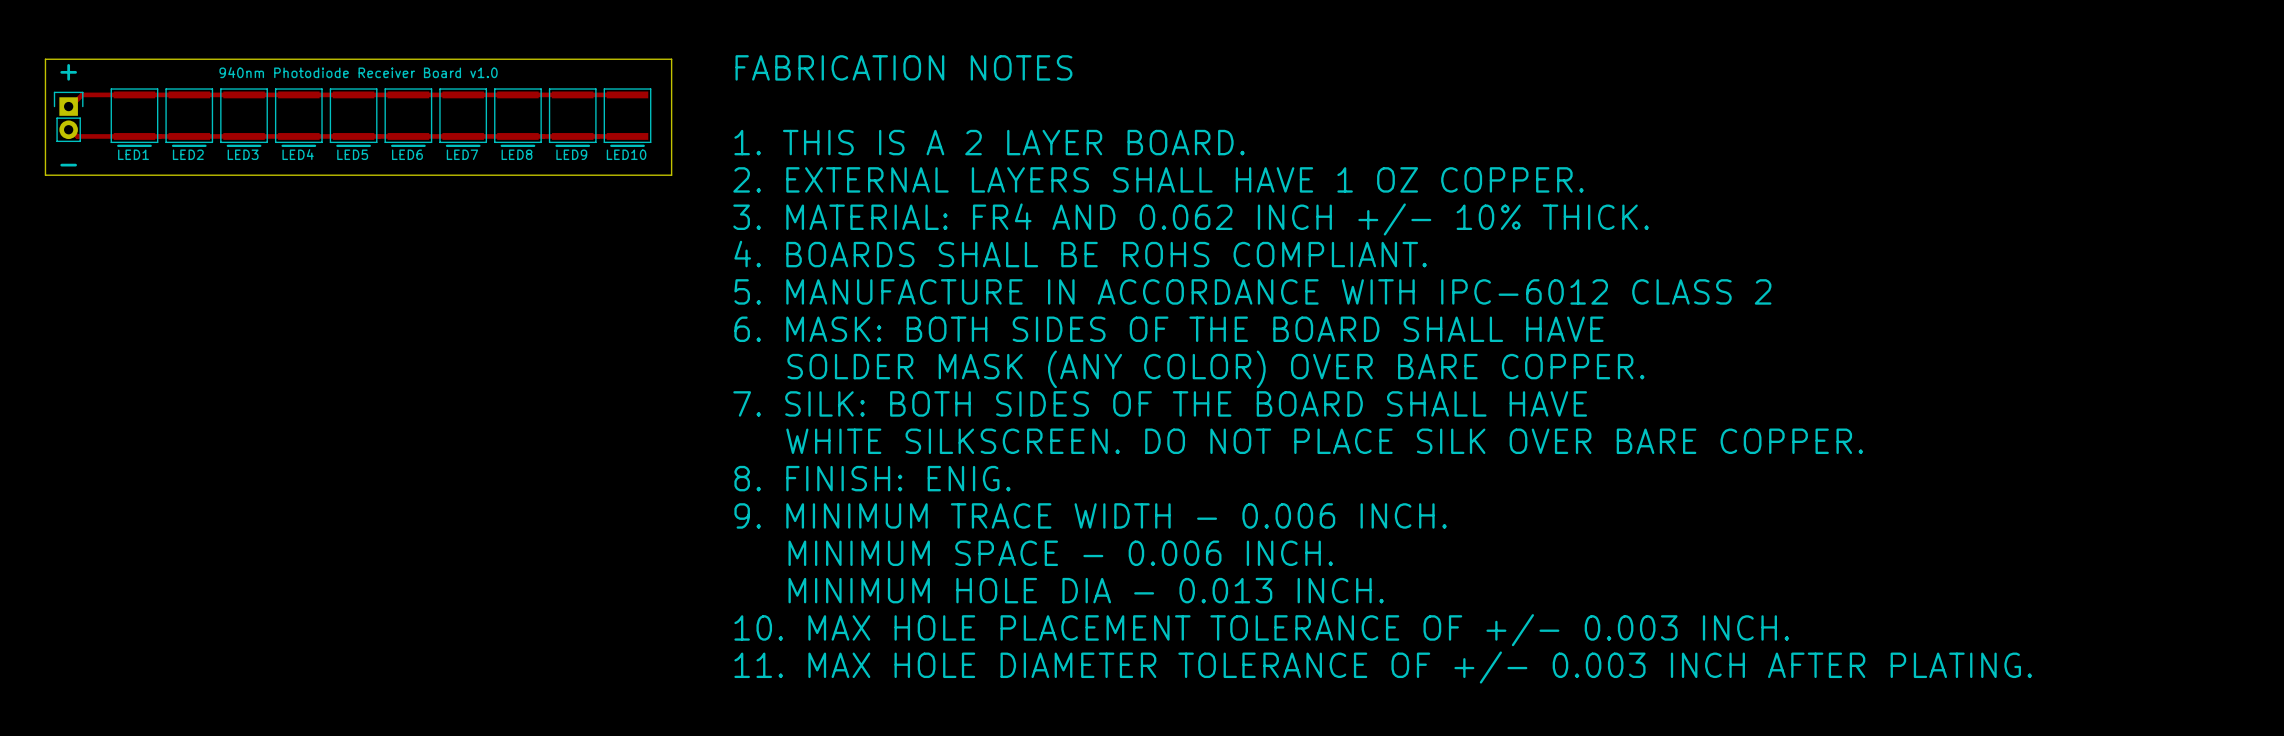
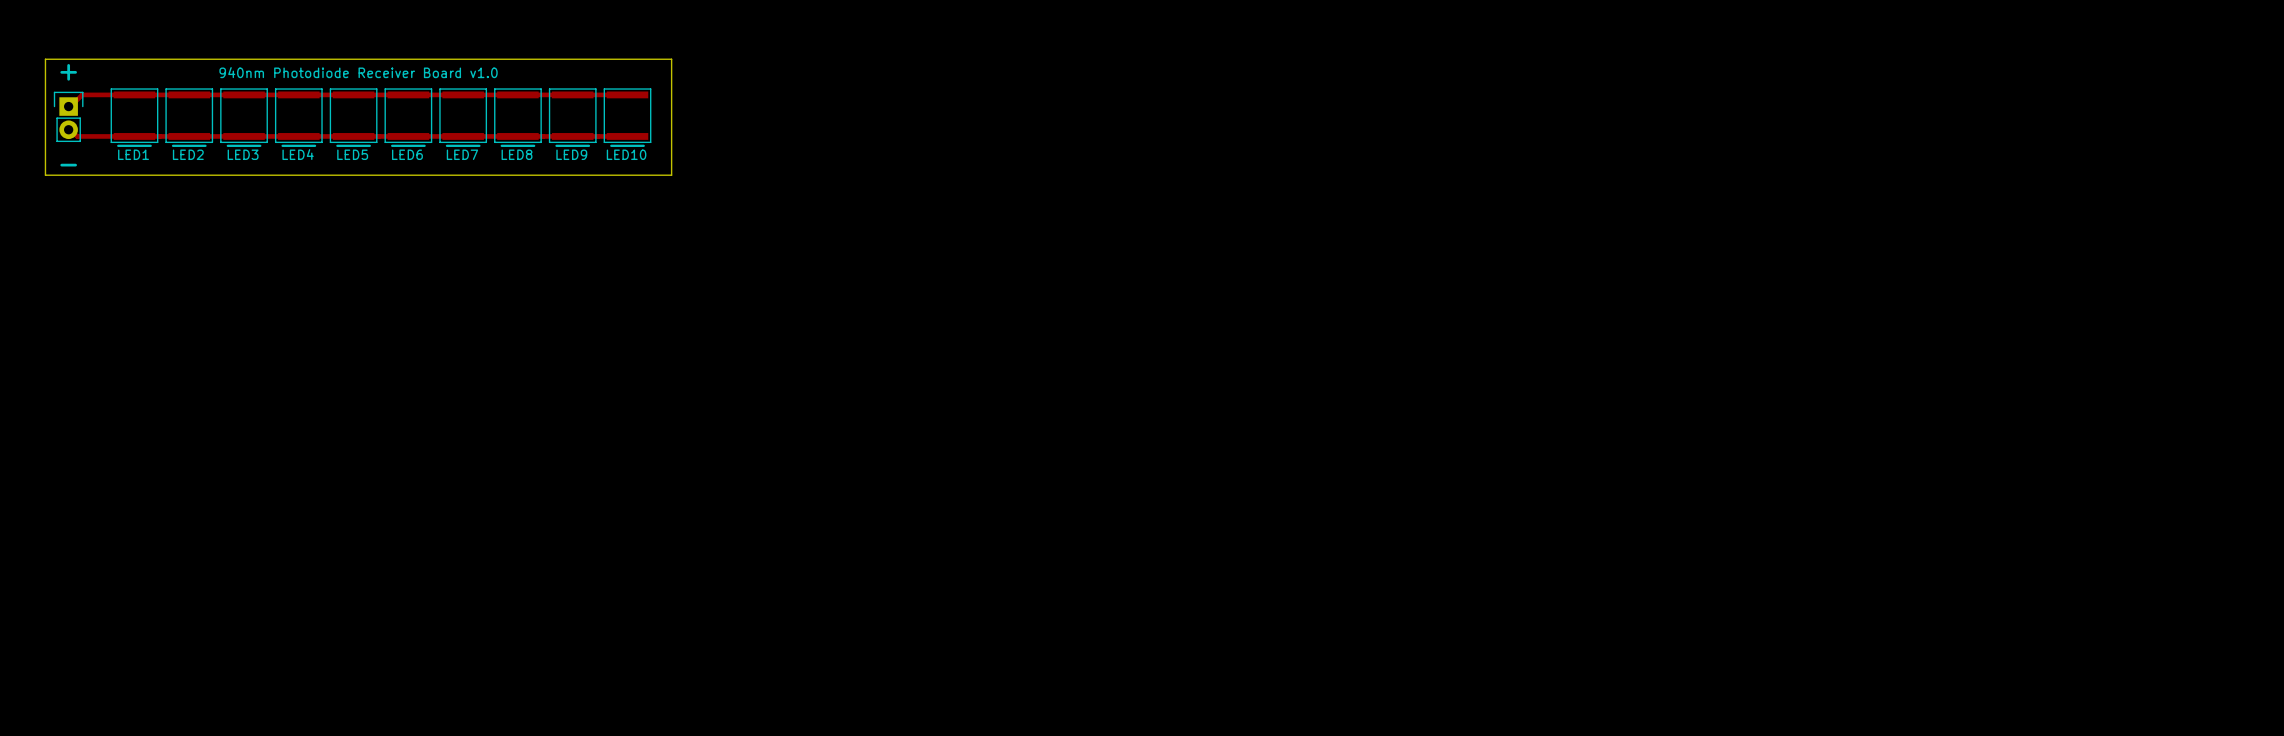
text: FABRICATION NOTES (903, 67) -> none
text: 1. THIS IS A 2 LAYER BOARD. (989, 142) -> none
text: 2. EXTERNAL LAYERS SHALL HAVE 1 OZ COPPER. (1158, 179) -> none
text: 3. MATERIAL: FR4 AND 0.062 INCH +/- 10% THICK. (1191, 219) -> none
text: 4. BOARDS SHALL BE ROHS COMPLIANT. (1080, 254) -> none
text: 5. MANUFACTURE IN ACCORDANCE WITH IPC-6012 CLASS 2 (1252, 291) -> none
text: 6. MASK: BOTH SIDES OF THE BOARD SHALL HAVE (1168, 329) -> none
text: SOLDER MASK (ANY COLOR) OVER BARE COPPER. (1215, 369) -> none
text: 7. SILK: BOTH SIDES OF THE BOARD SHALL HAVE (1160, 403) -> none
text: WHITE SILKSCREEN. DO NOT PLACE SILK OVER BARE COPPER. (1324, 441) -> none
text: 8. FINISH: ENIG. (872, 478) -> none
text: 9. MINIMUM TRACE WIDTH - 0.006 INCH. (1090, 515) -> none
text: MINIMUM SPACE - 0.006 INCH. (1060, 553) -> none
text: MINIMUM HOLE DIA - 0.013 INCH. (1086, 590) -> none
text: 10. MAX HOLE PLACEMENT TOLERANCE OF +/- 0.003 INCH. (1261, 630) -> none
text: 11. MAX HOLE DIAMETER TOLERANCE OF +/- 0.003 INCH AFTER PLATING. (1383, 667) -> none

